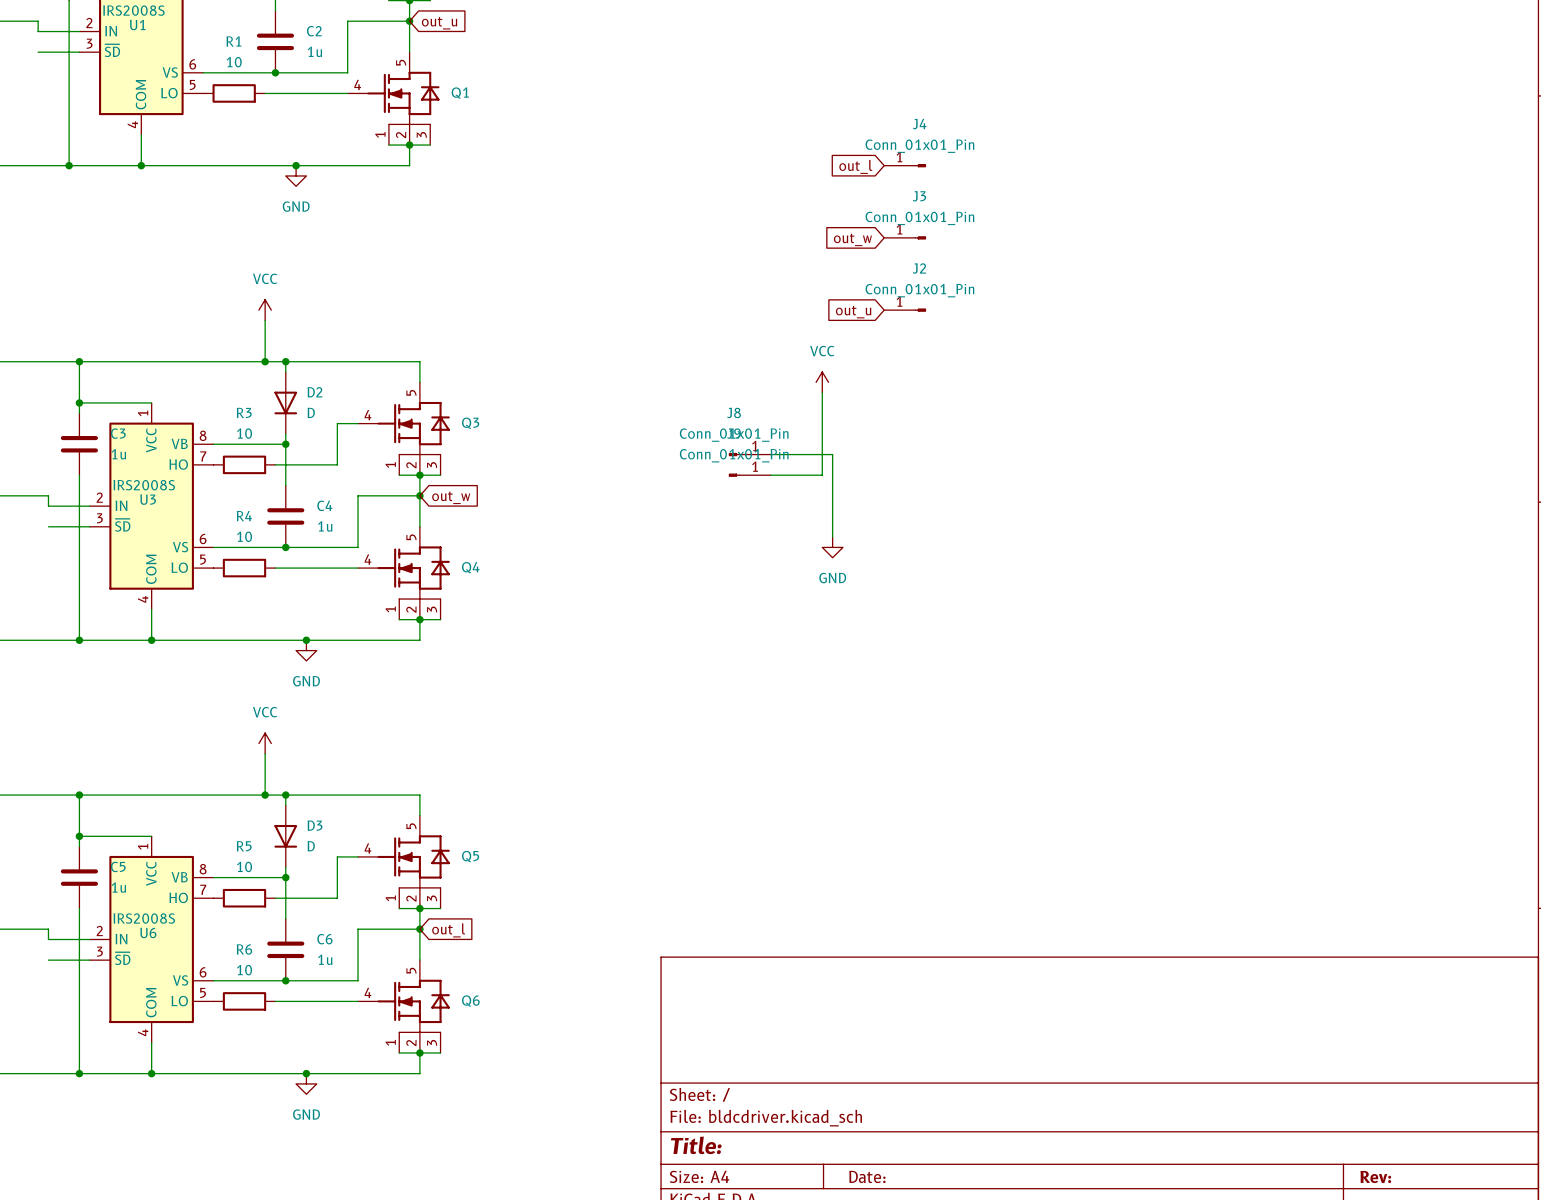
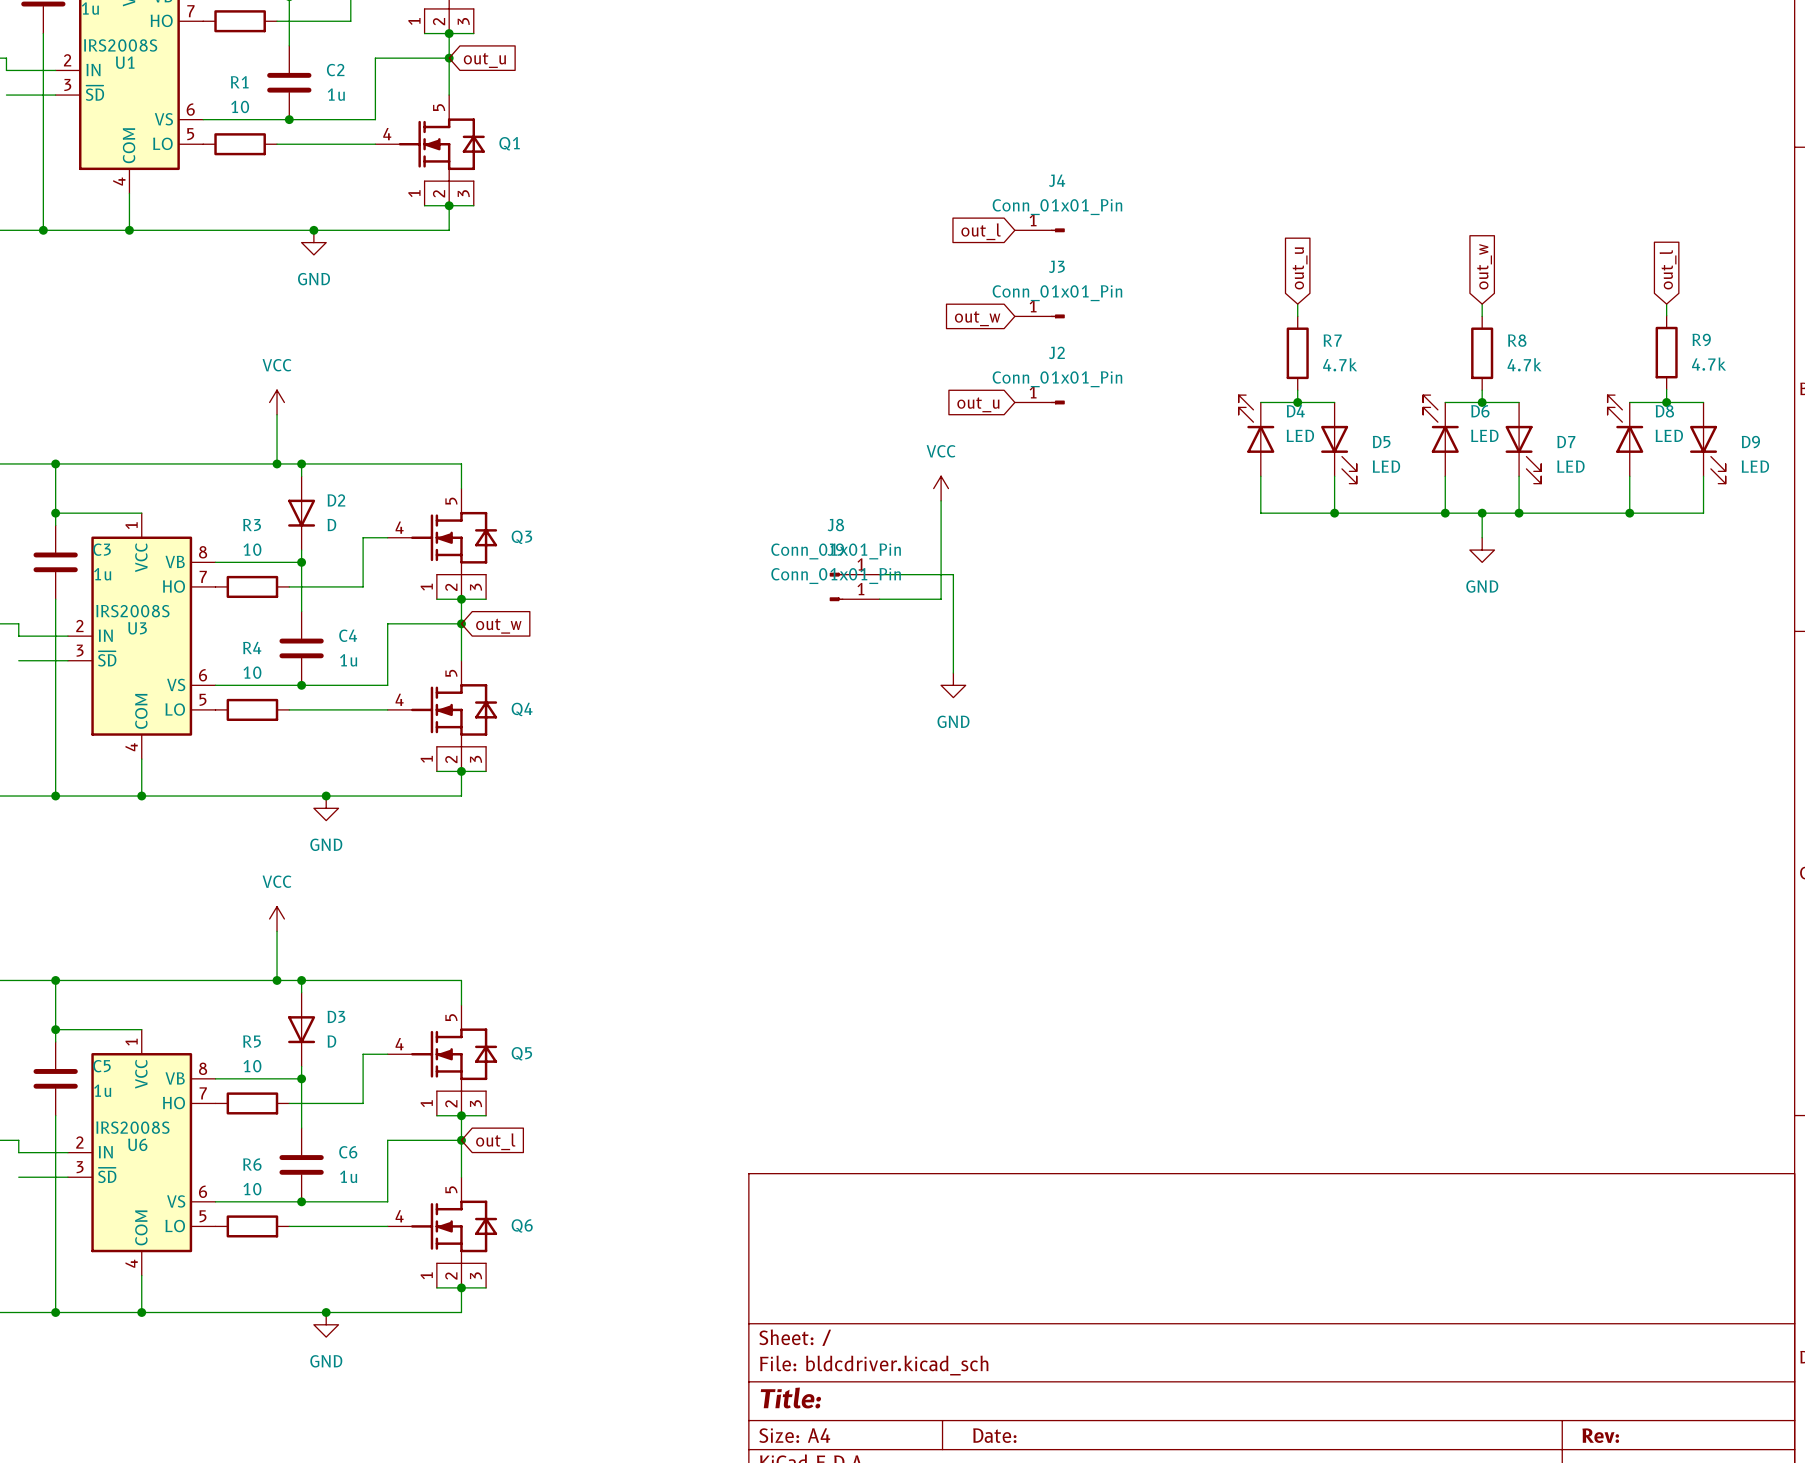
global label: none -> out_w (1484, 266)
global label: none -> out_u (1299, 268)
global label: none -> out_l (1668, 269)
wire: none -> (1297, 304) (1297, 316)
wire: none -> (1482, 304) (1482, 316)
wire: none -> (1666, 304) (1666, 315)
R7: none -> 4.7k (1297, 353)
R8: none -> 4.7k (1482, 353)
R9: none -> 4.7k (1666, 352)
wire: none -> (1297, 390) (1297, 402)
wire: none -> (1482, 390) (1482, 402)
wire: none -> (1666, 389) (1666, 402)
wire: none -> (1260, 402) (1334, 402)
junction: none -> (1297, 402)
wire: none -> (1445, 402) (1519, 402)
junction: none -> (1482, 402)
wire: none -> (1629, 402) (1703, 402)
junction: none -> (1666, 402)
D4: none -> LED (1256, 435)
D6: none -> LED (1440, 435)
D8: none -> LED (1625, 435)
D5: none -> LED (1338, 443)
D7: none -> LED (1523, 443)
D9: none -> LED (1707, 443)
wire: none -> (1260, 476) (1260, 513) (1703, 513) (1703, 476)
wire: none -> (1334, 476) (1334, 513)
wire: none -> (1445, 476) (1445, 513)
wire: none -> (1519, 476) (1519, 513)
wire: none -> (1629, 476) (1629, 513)
junction: none -> (1334, 513)
junction: none -> (1445, 513)
wire: none -> (1482, 513) (1482, 537)
junction: none -> (1482, 513)
junction: none -> (1519, 513)
junction: none -> (1629, 513)
power symbol: none -> GND (1482, 550)

